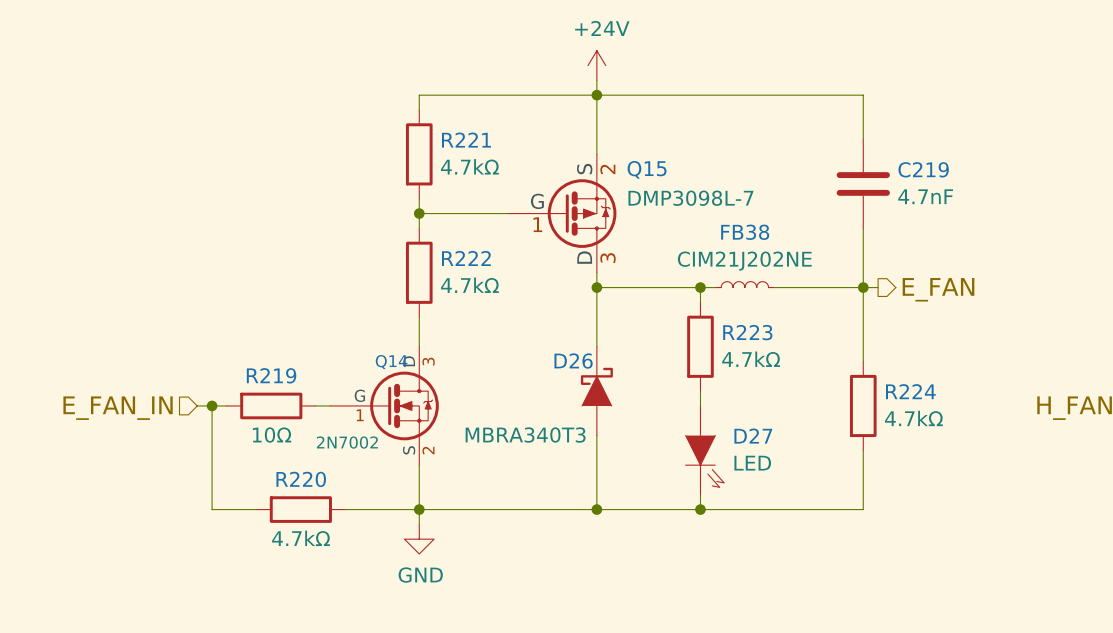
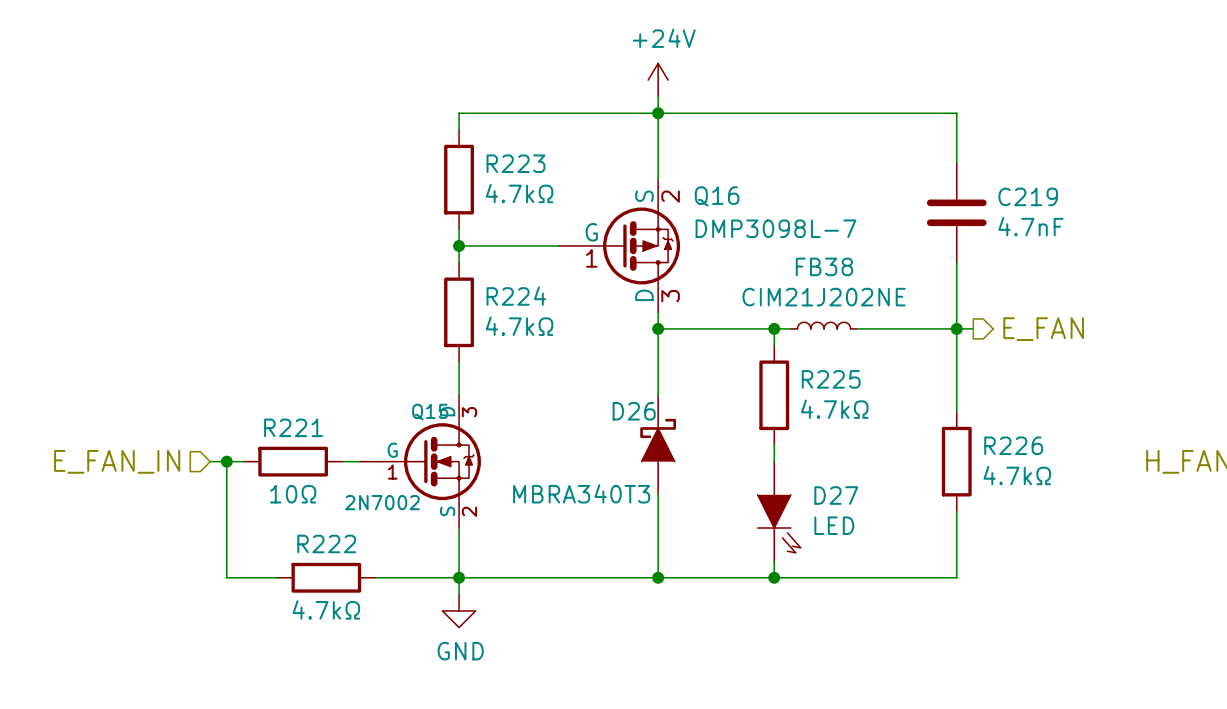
R221 name: R221 (466, 140) -> R223 (515, 163)
Q15 name: Q15 (647, 169) -> Q16 (717, 196)
R222 name: R222 (466, 258) -> R224 (516, 296)
R223 name: R223 (747, 332) -> R225 (831, 379)
Q14 name: Q14 (391, 362) -> Q15 (430, 412)
R219 name: R219 (271, 375) -> R221 (293, 427)
R224 name: R224 (910, 391) -> R226 (1013, 445)
R220 name: R220 (301, 479) -> R222 (326, 543)

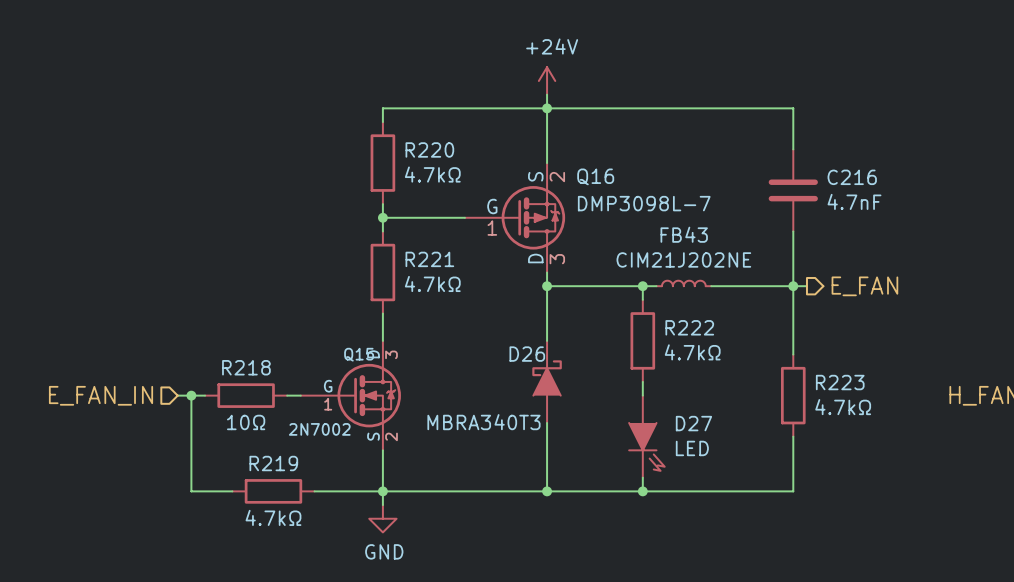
R223 name: R223 (515, 163) -> R220 (429, 149)
C219 name: C219 (1028, 196) -> C216 (852, 177)
FB38 name: FB38 (824, 266) -> FB43 (684, 234)
R224 name: R224 (516, 296) -> R221 (429, 259)
R225 name: R225 (831, 379) -> R222 (689, 327)
R221 name: R221 (293, 427) -> R218 (246, 367)
R226 name: R226 (1013, 445) -> R223 (840, 382)
R222 name: R222 (326, 543) -> R219 (273, 463)

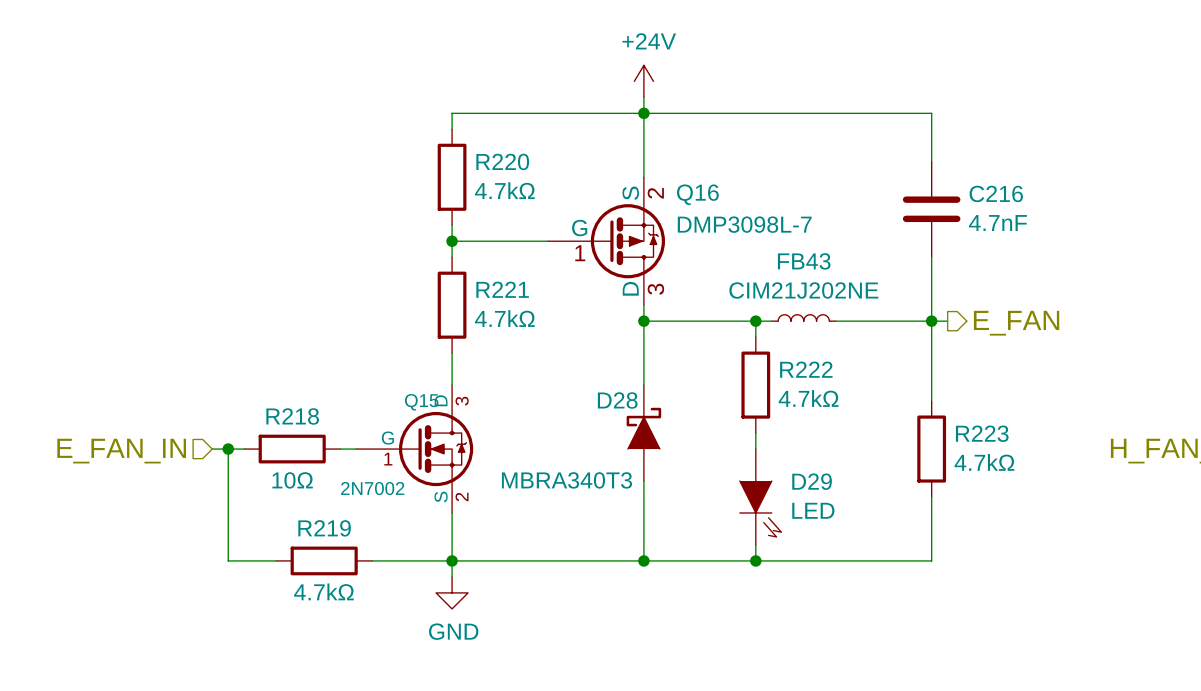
D26 name: D26 (527, 354) -> D28 (617, 400)
D27 name: D27 (693, 423) -> D29 (812, 481)

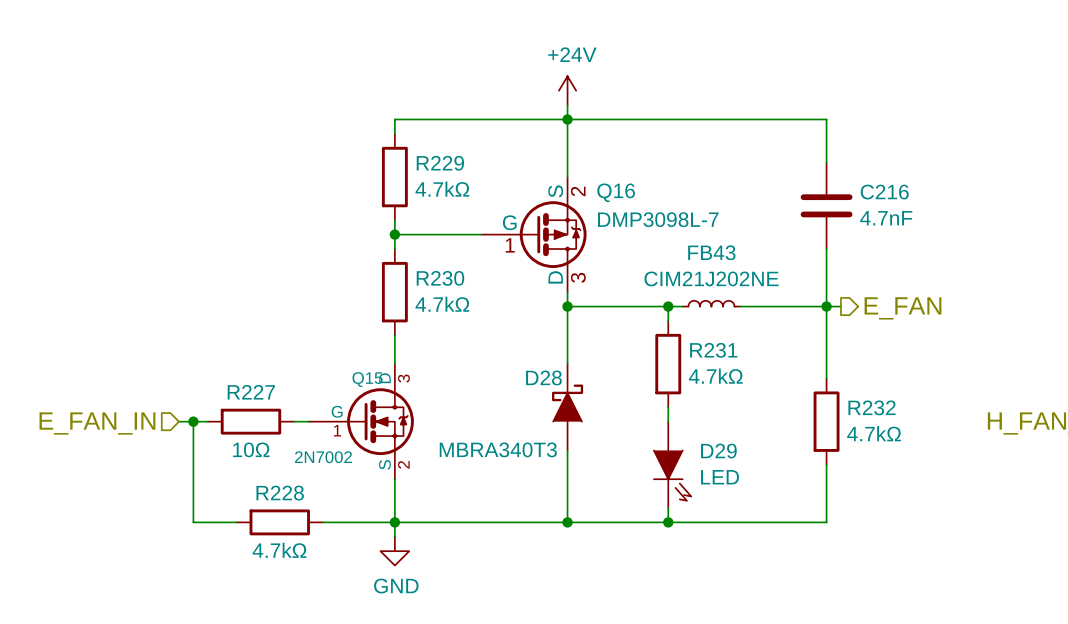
R220 name: R220 (502, 161) -> R229 (440, 163)
R221 name: R221 (502, 289) -> R230 (440, 278)
R222 name: R222 (806, 369) -> R231 (713, 350)
R218 name: R218 (292, 416) -> R227 (251, 392)
R223 name: R223 (982, 433) -> R232 (872, 407)
R219 name: R219 (324, 528) -> R228 (280, 493)

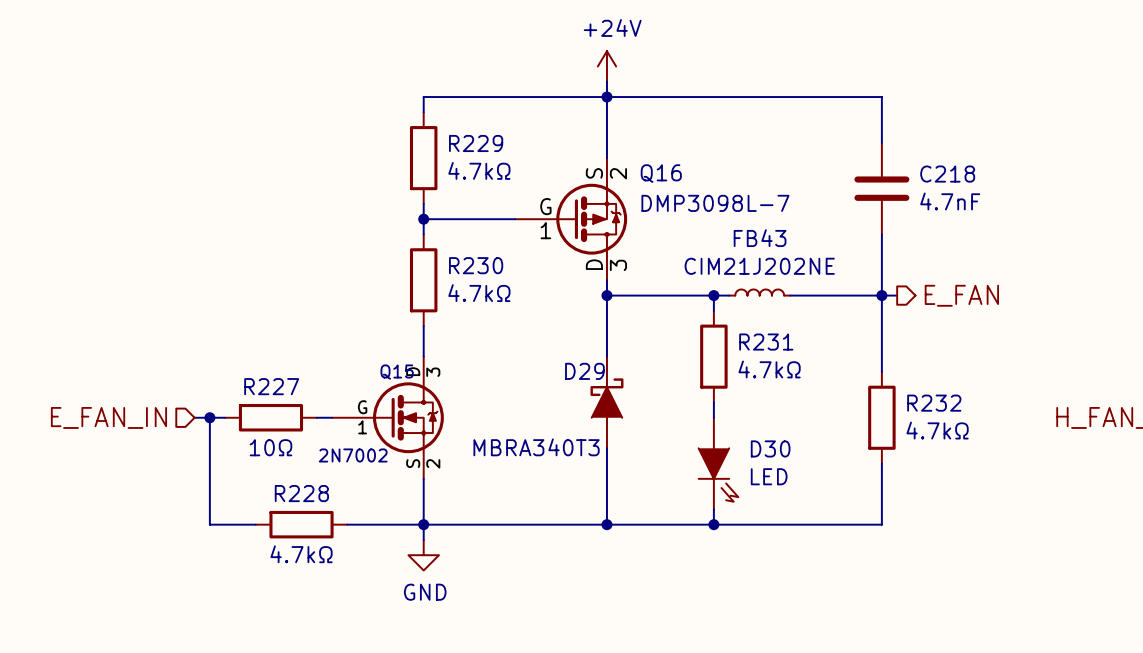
C216 name: C216 (884, 192) -> C218 (947, 174)
D28 name: D28 (543, 377) -> D29 (584, 371)
D29 name: D29 (718, 451) -> D30 (770, 448)

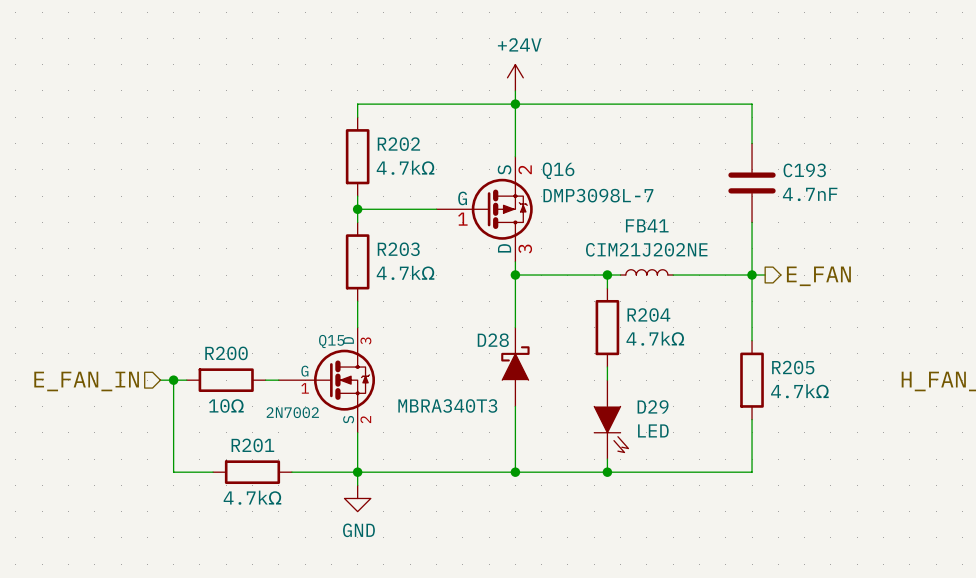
R229 name: R229 (476, 143) -> R202 (398, 144)
C218 name: C218 (947, 174) -> C193 (804, 170)
FB43 name: FB43 (760, 238) -> FB41 (647, 225)
R230 name: R230 (476, 265) -> R203 (398, 249)
R231 name: R231 (766, 342) -> R204 (648, 315)
D29 name: D29 (584, 371) -> D28 (493, 340)
R227 name: R227 (271, 386) -> R200 (226, 353)
R232 name: R232 (934, 403) -> R205 (793, 367)
D30 name: D30 (770, 448) -> D29 (653, 406)
R228 name: R228 (301, 493) -> R201 (252, 445)

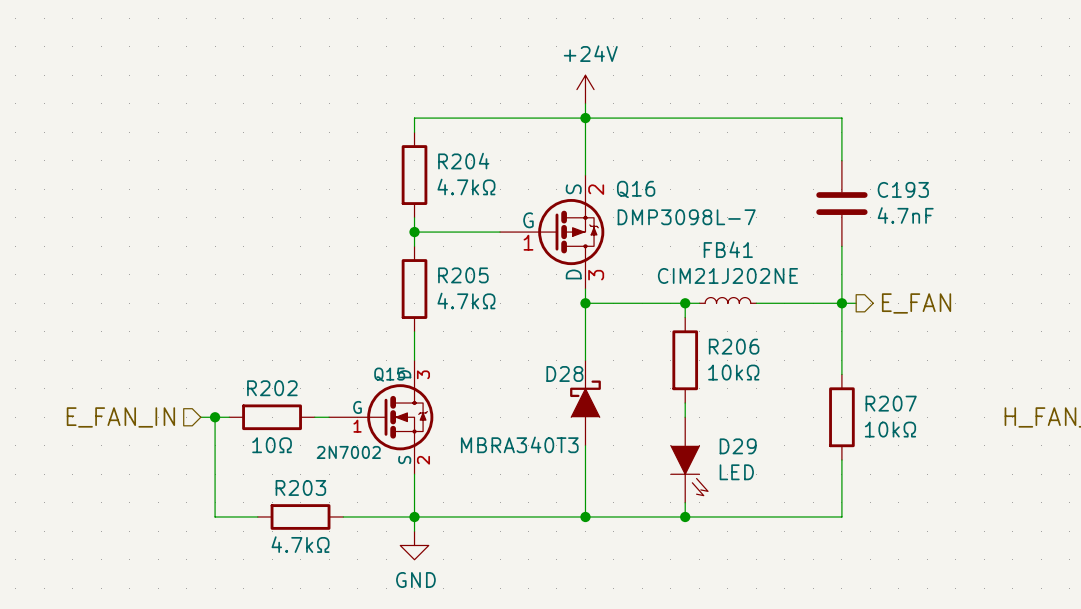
R202 name: R202 (398, 144) -> R204 (463, 161)
R203 name: R203 (398, 249) -> R205 (463, 275)
R204 name: R204 (648, 315) -> R206 (734, 346)
R204 value: 4.7kΩ (655, 338) -> 10kΩ (733, 372)
R200 name: R200 (226, 353) -> R202 (272, 388)
R205 name: R205 (793, 367) -> R207 (891, 403)
R205 value: 4.7kΩ (799, 391) -> 10kΩ (890, 429)
R201 name: R201 (252, 445) -> R203 (300, 487)

